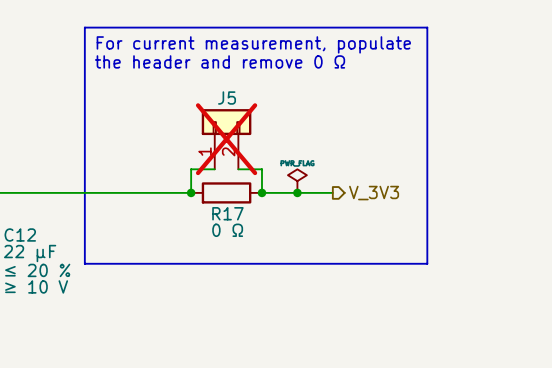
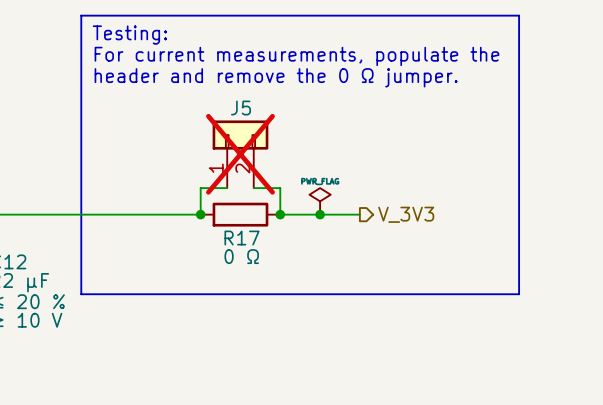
line: (84, 27) (427, 27) (427, 263) -> (81, 28) (81, 15) (519, 15) (519, 294) (466, 294)
text: none -> Testing: (129, 35)
text: For current measurement, populate (253, 44) -> For current measurements, populate the (296, 56)
text: the header and remove 0 Ω (220, 61) -> header and remove the 0 Ω jumper. (276, 77)

